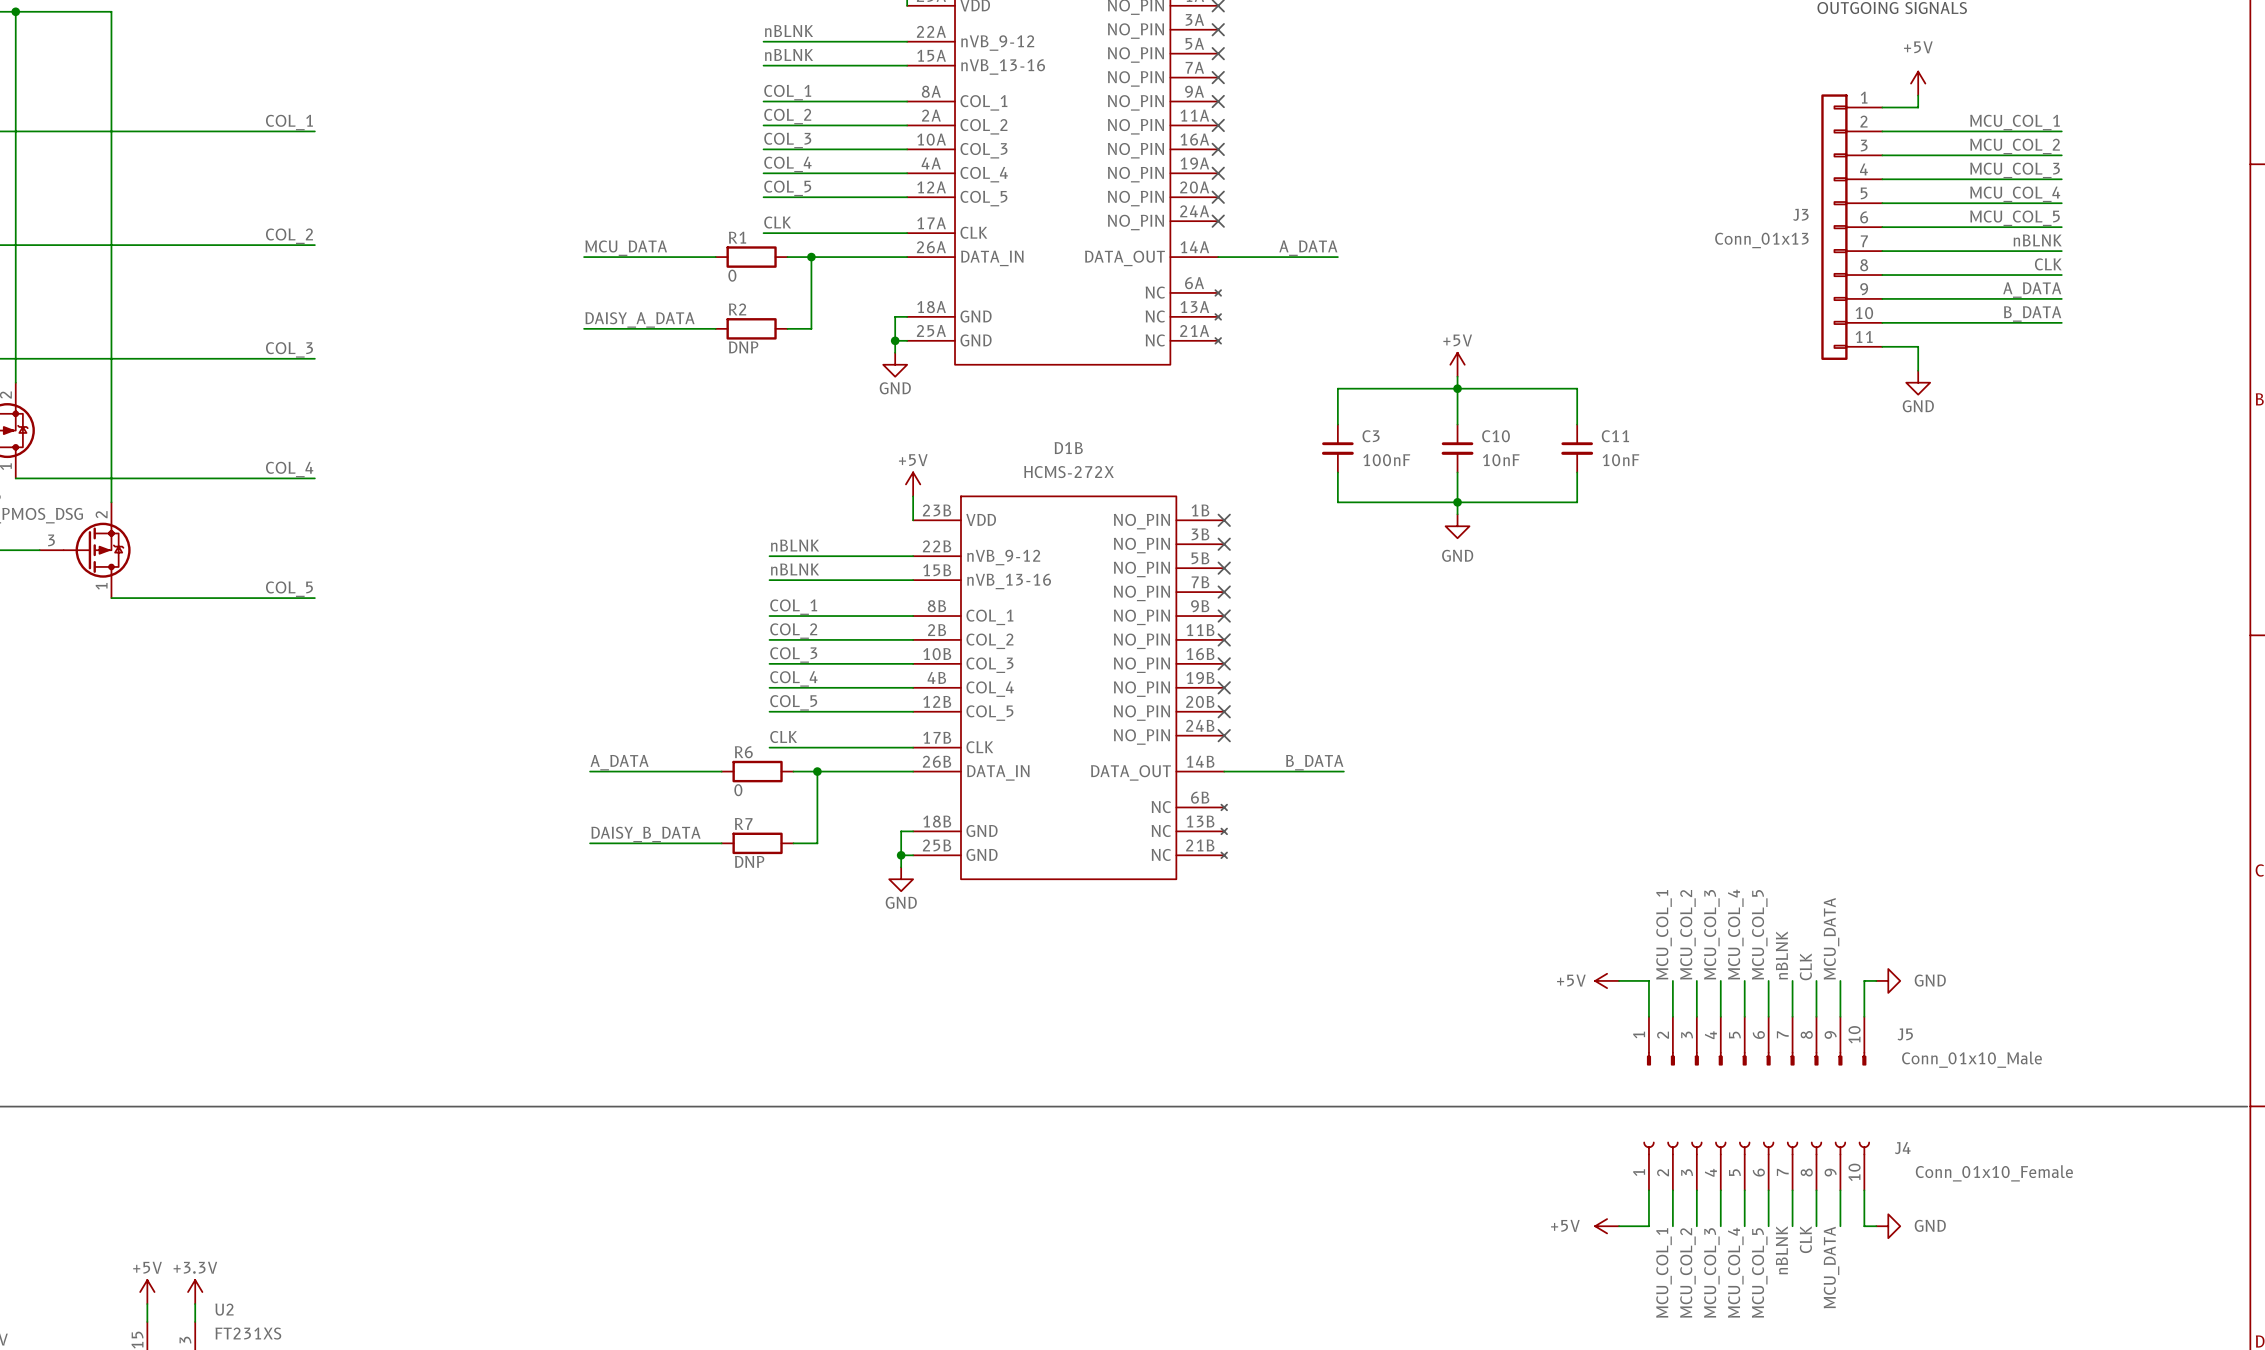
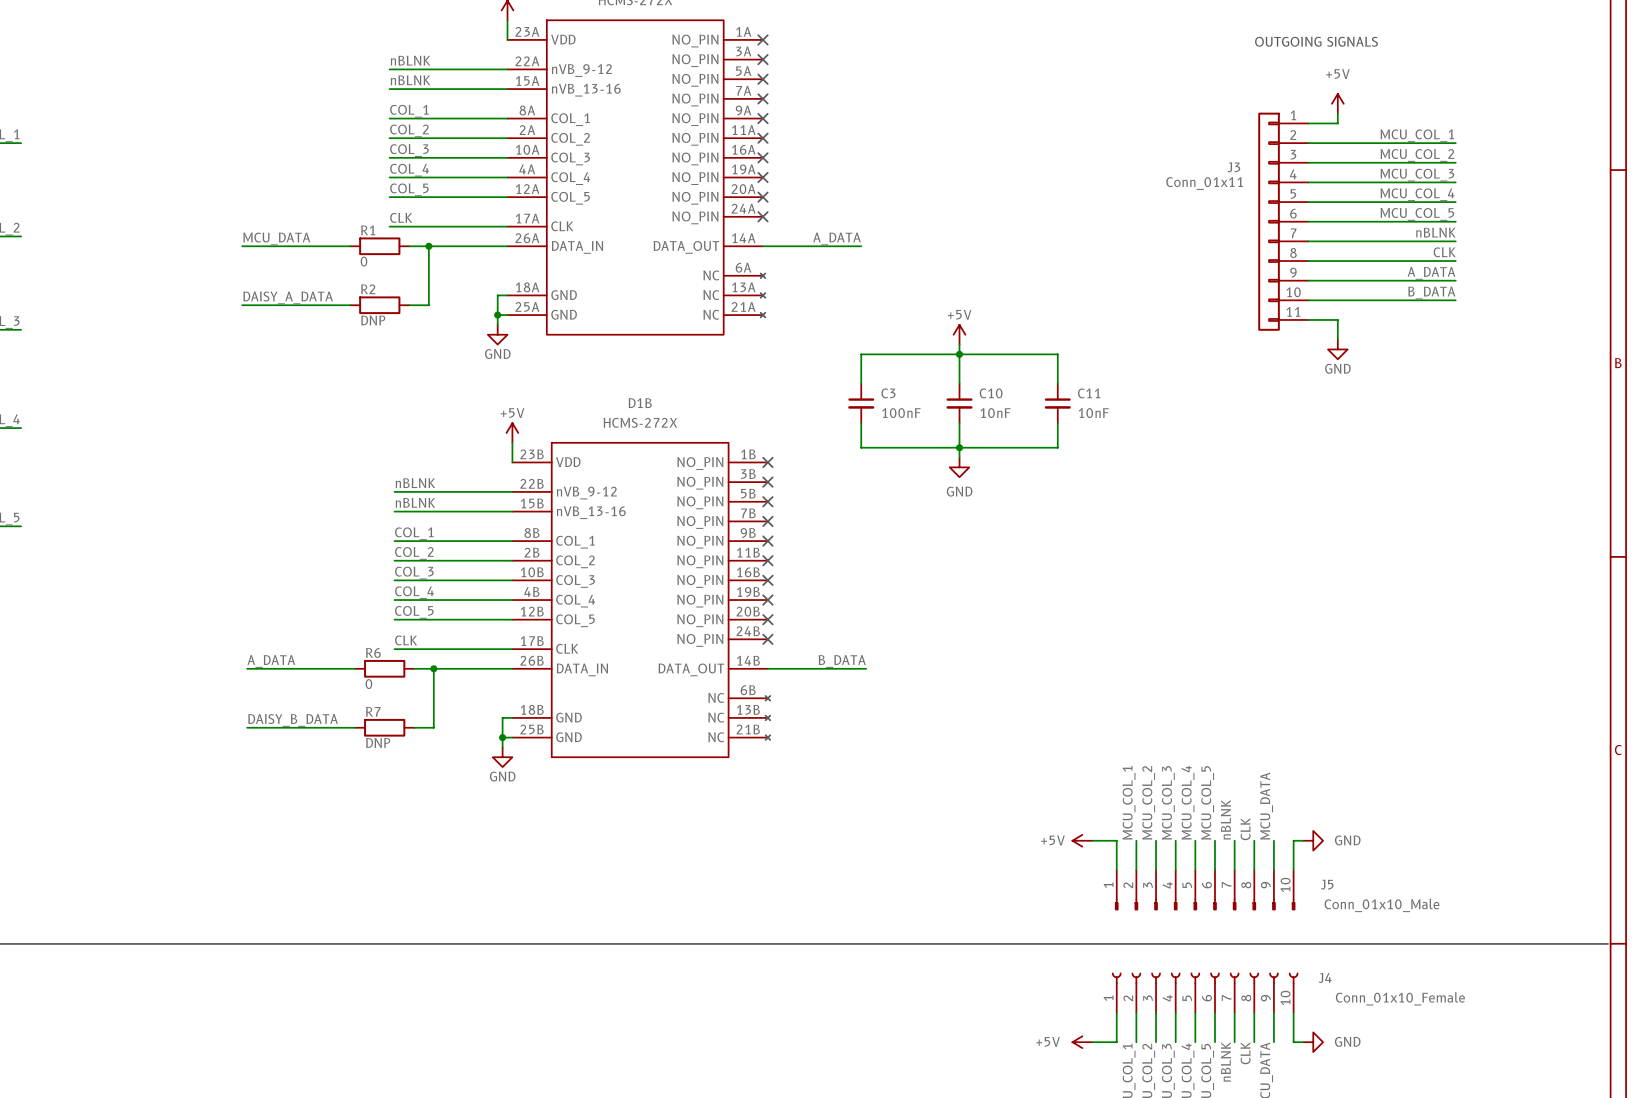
J3 name position: J3 (1800, 214) -> J3 (1233, 167)
J3 value: Conn_01x13 (1761, 240) -> Conn_01x11 (1204, 183)

